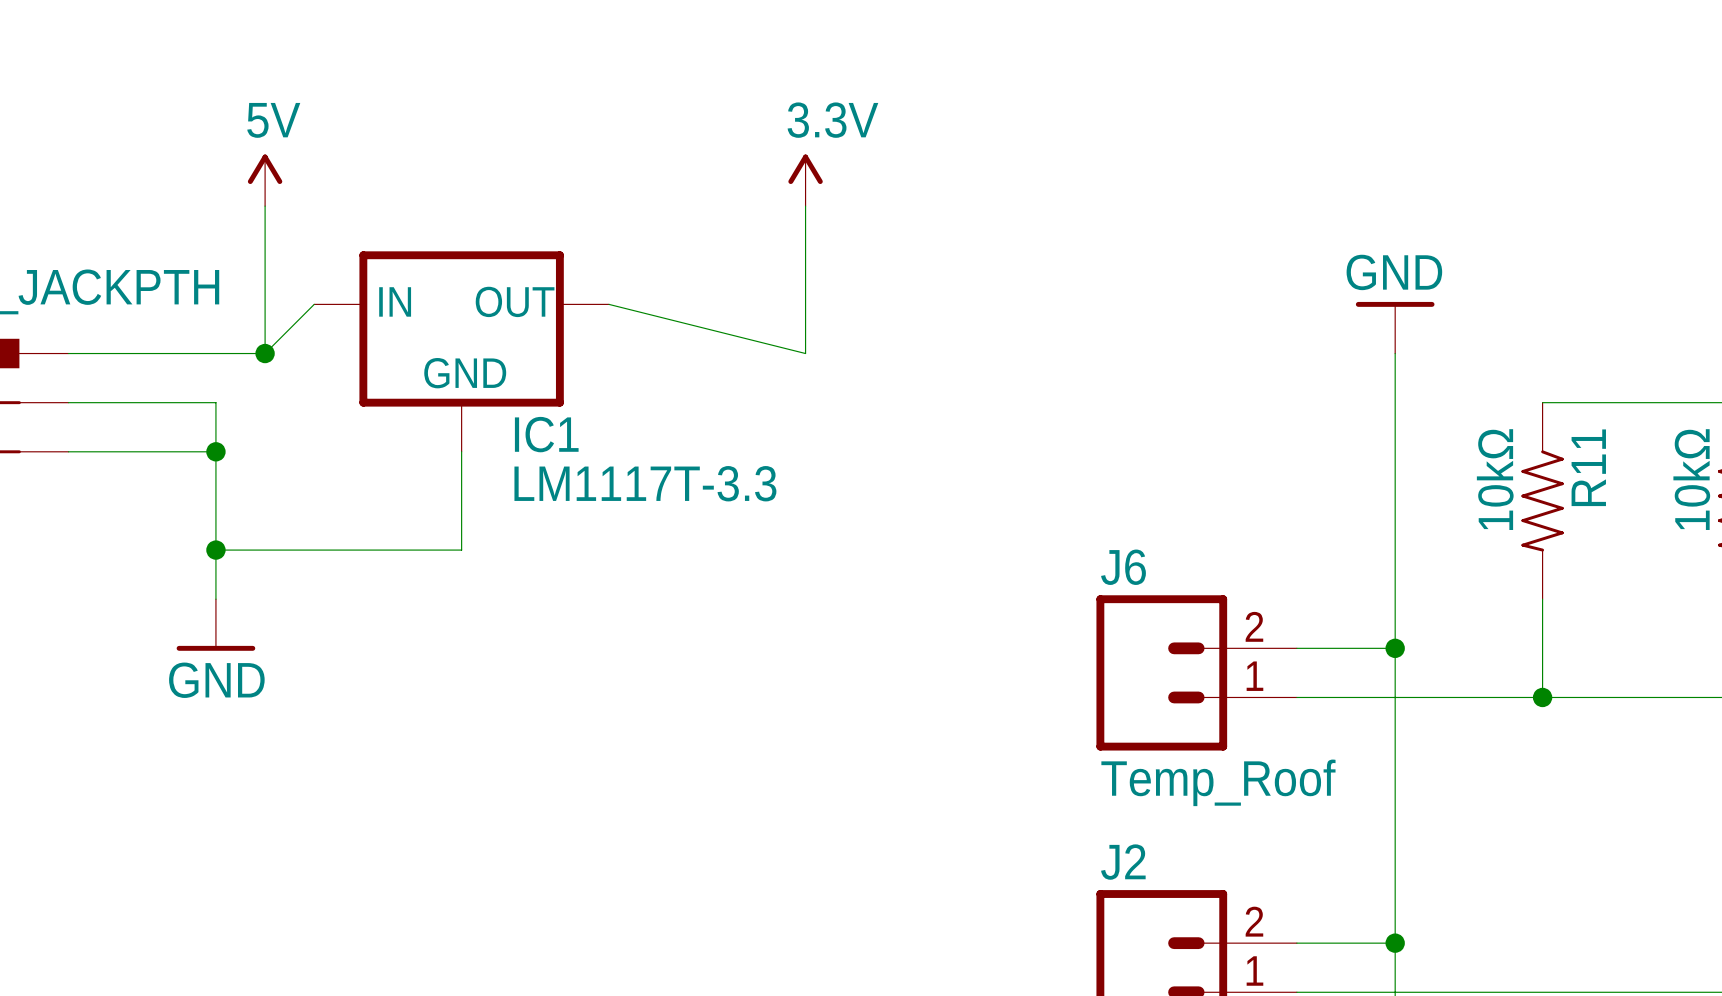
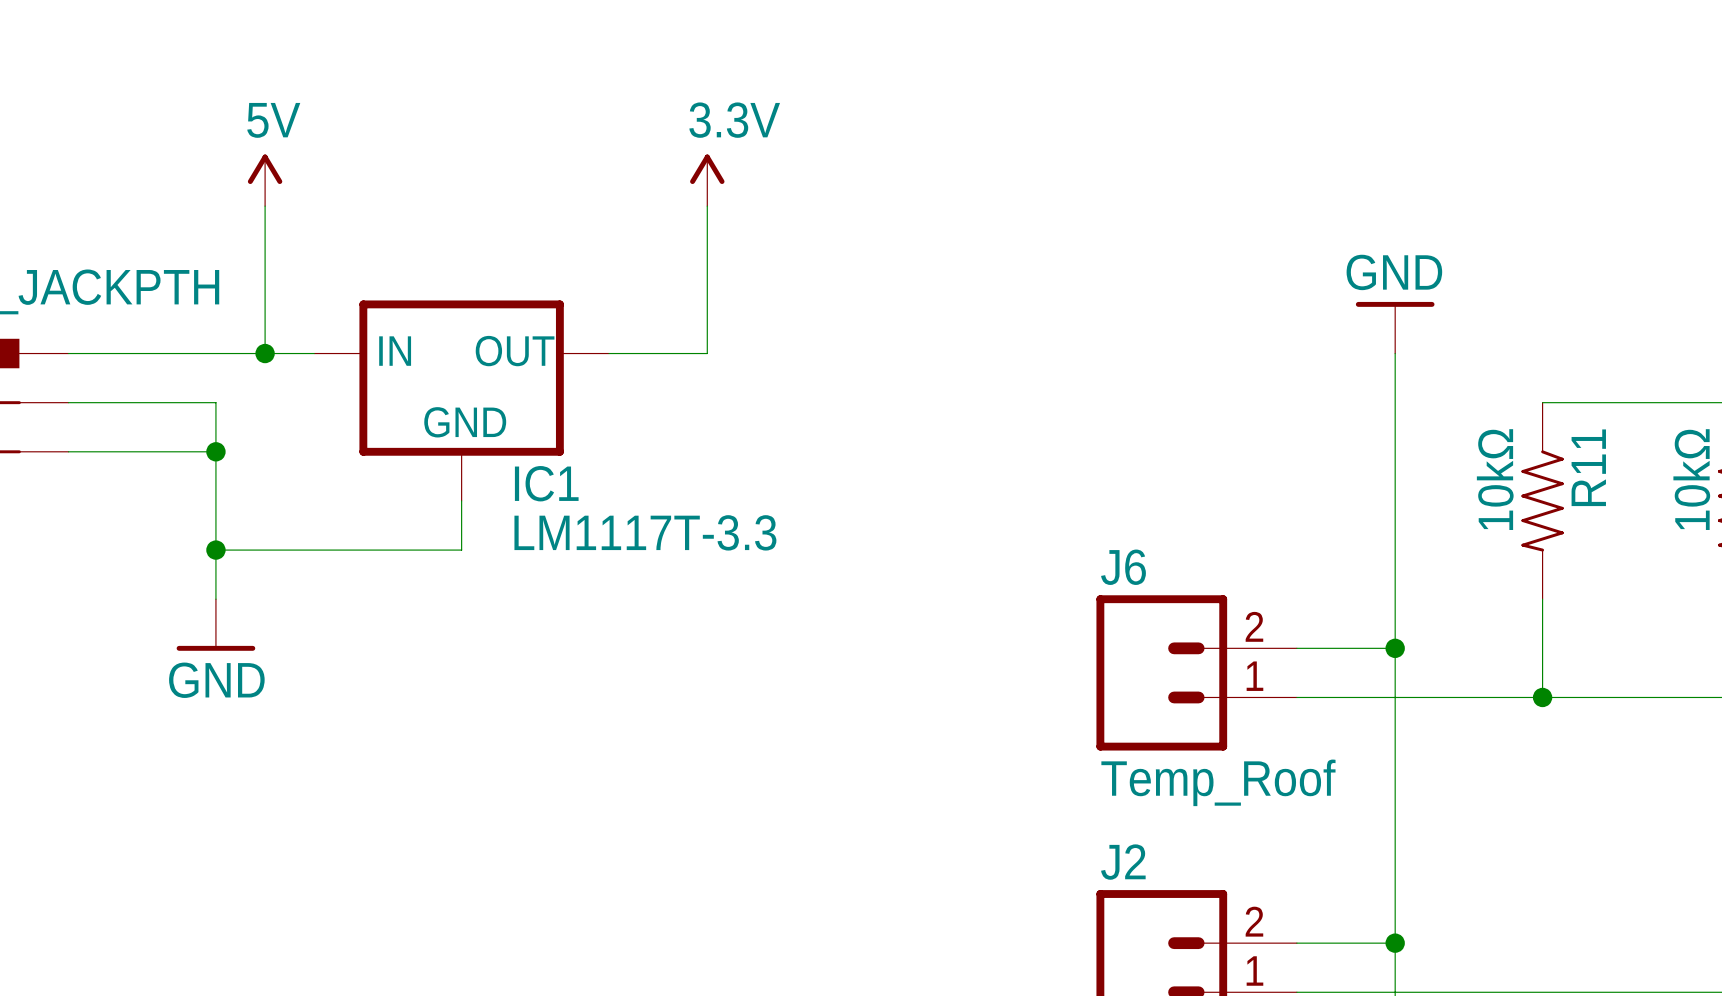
power symbol position: 3.3V (805, 180) -> 3.3V (707, 180)
wire: none -> (707, 206) (707, 353) (609, 353)
wire: (805, 206) (805, 353) (609, 304) -> none
wire: (314, 304) (265, 353) -> (314, 353) (265, 353)
IC1 position: (461, 351) -> (461, 400)

